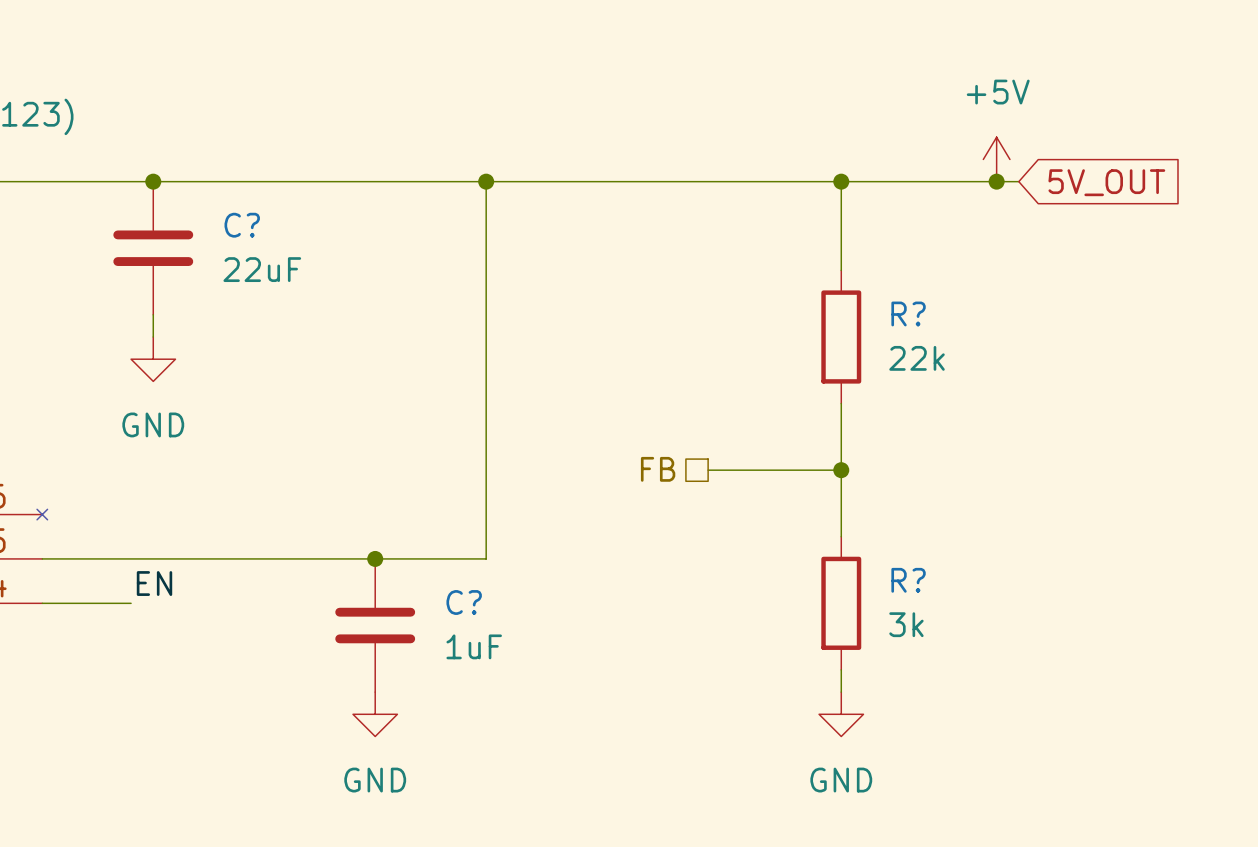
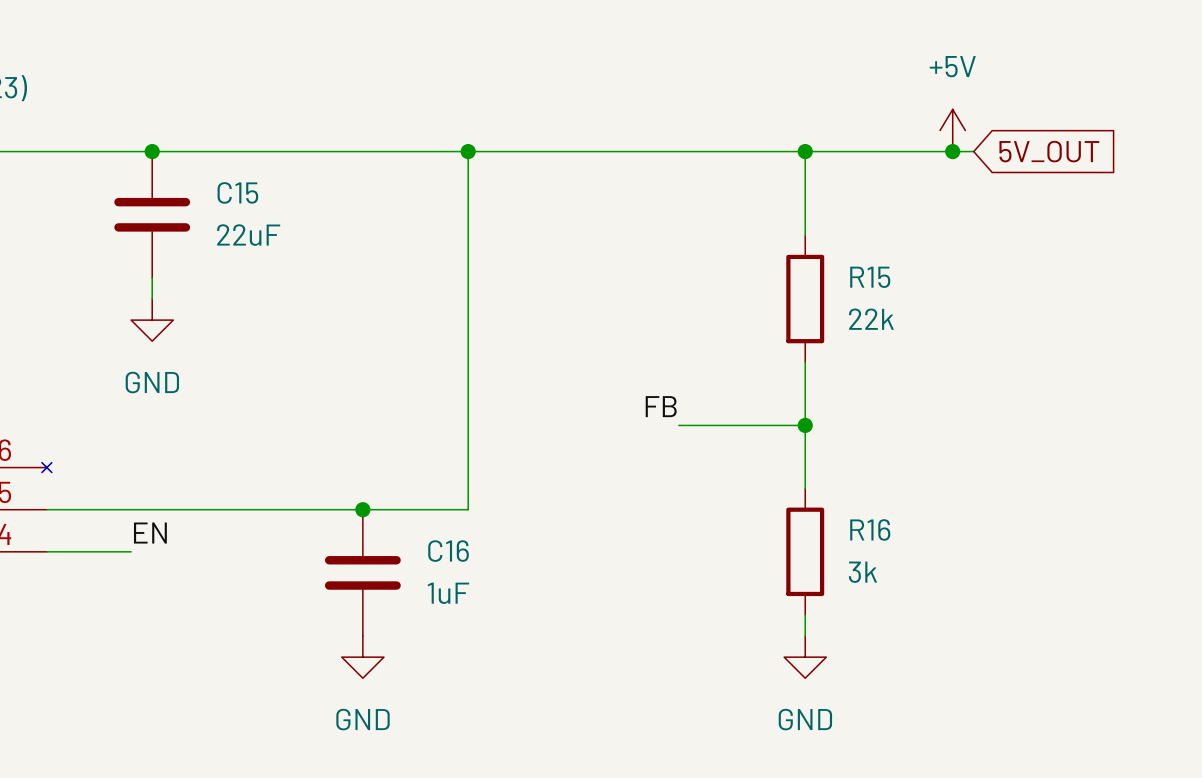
C? name: C? (242, 225) -> C15 (237, 192)
R? name: R? (908, 313) -> R15 (870, 277)
label: none -> FB (661, 406)
hierarchical label: FB (658, 469) -> none
R? name: R? (908, 580) -> R16 (870, 529)
C? name: C? (464, 602) -> C16 (448, 551)

